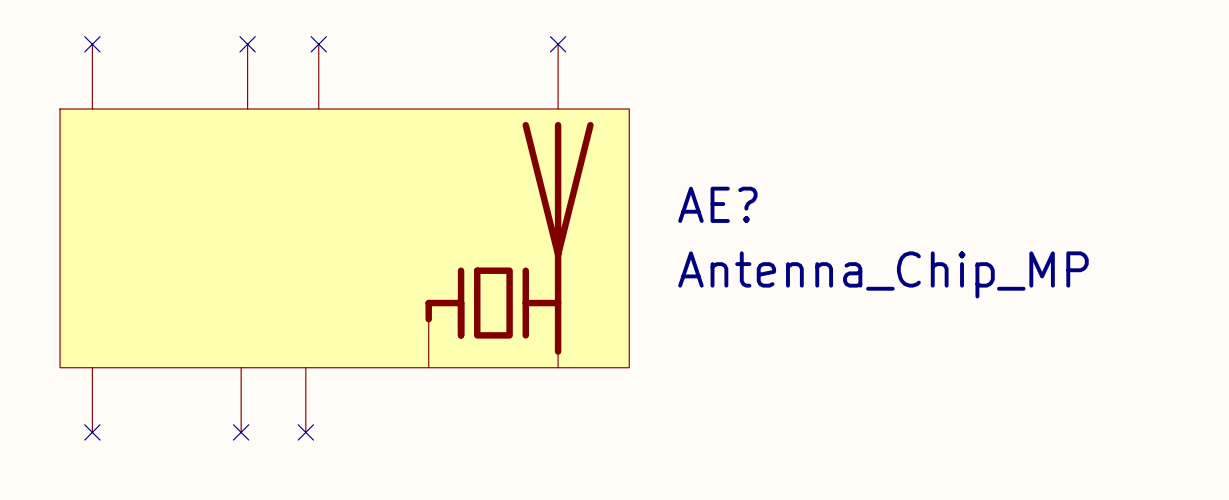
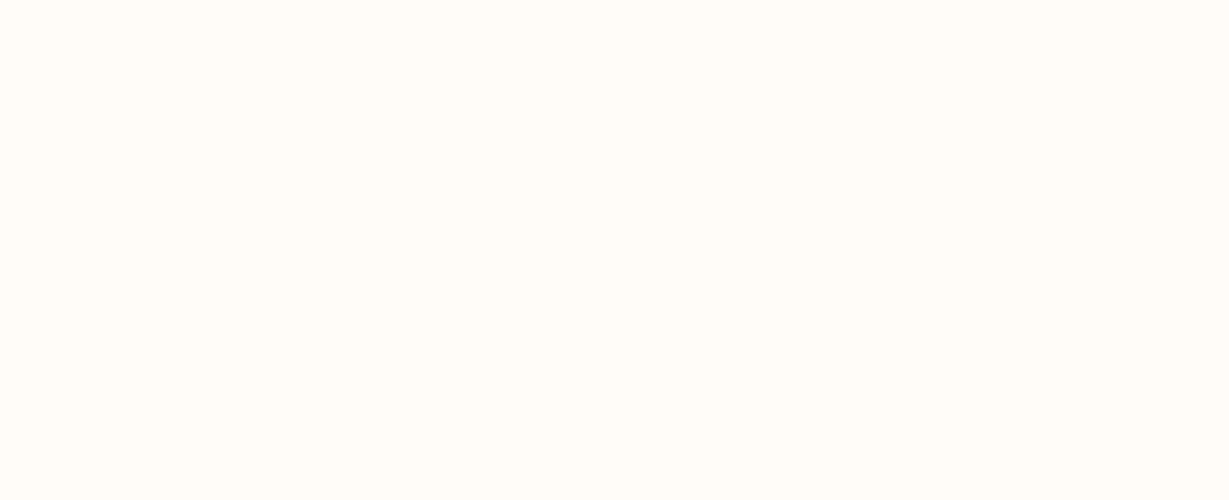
AE?: Antenna_Chip_MP (344, 238) -> none

